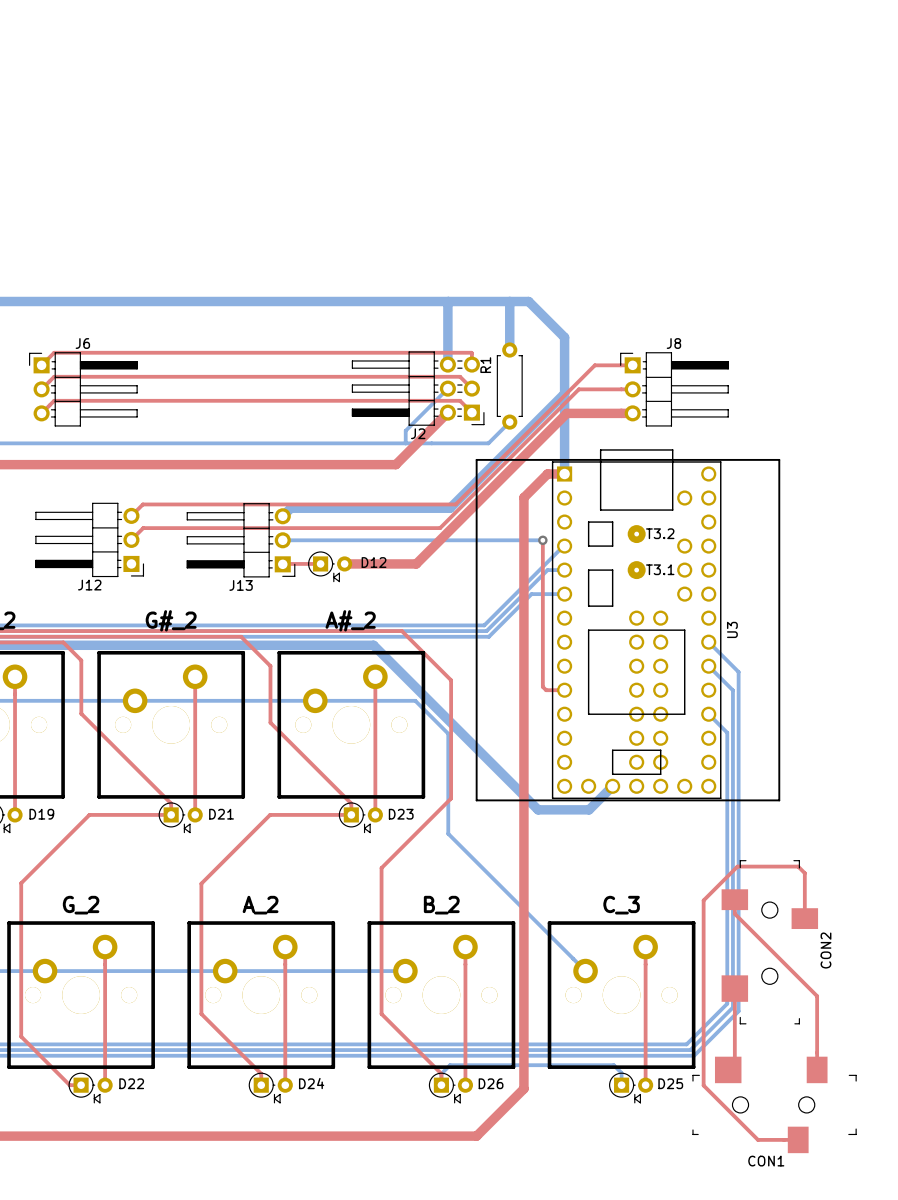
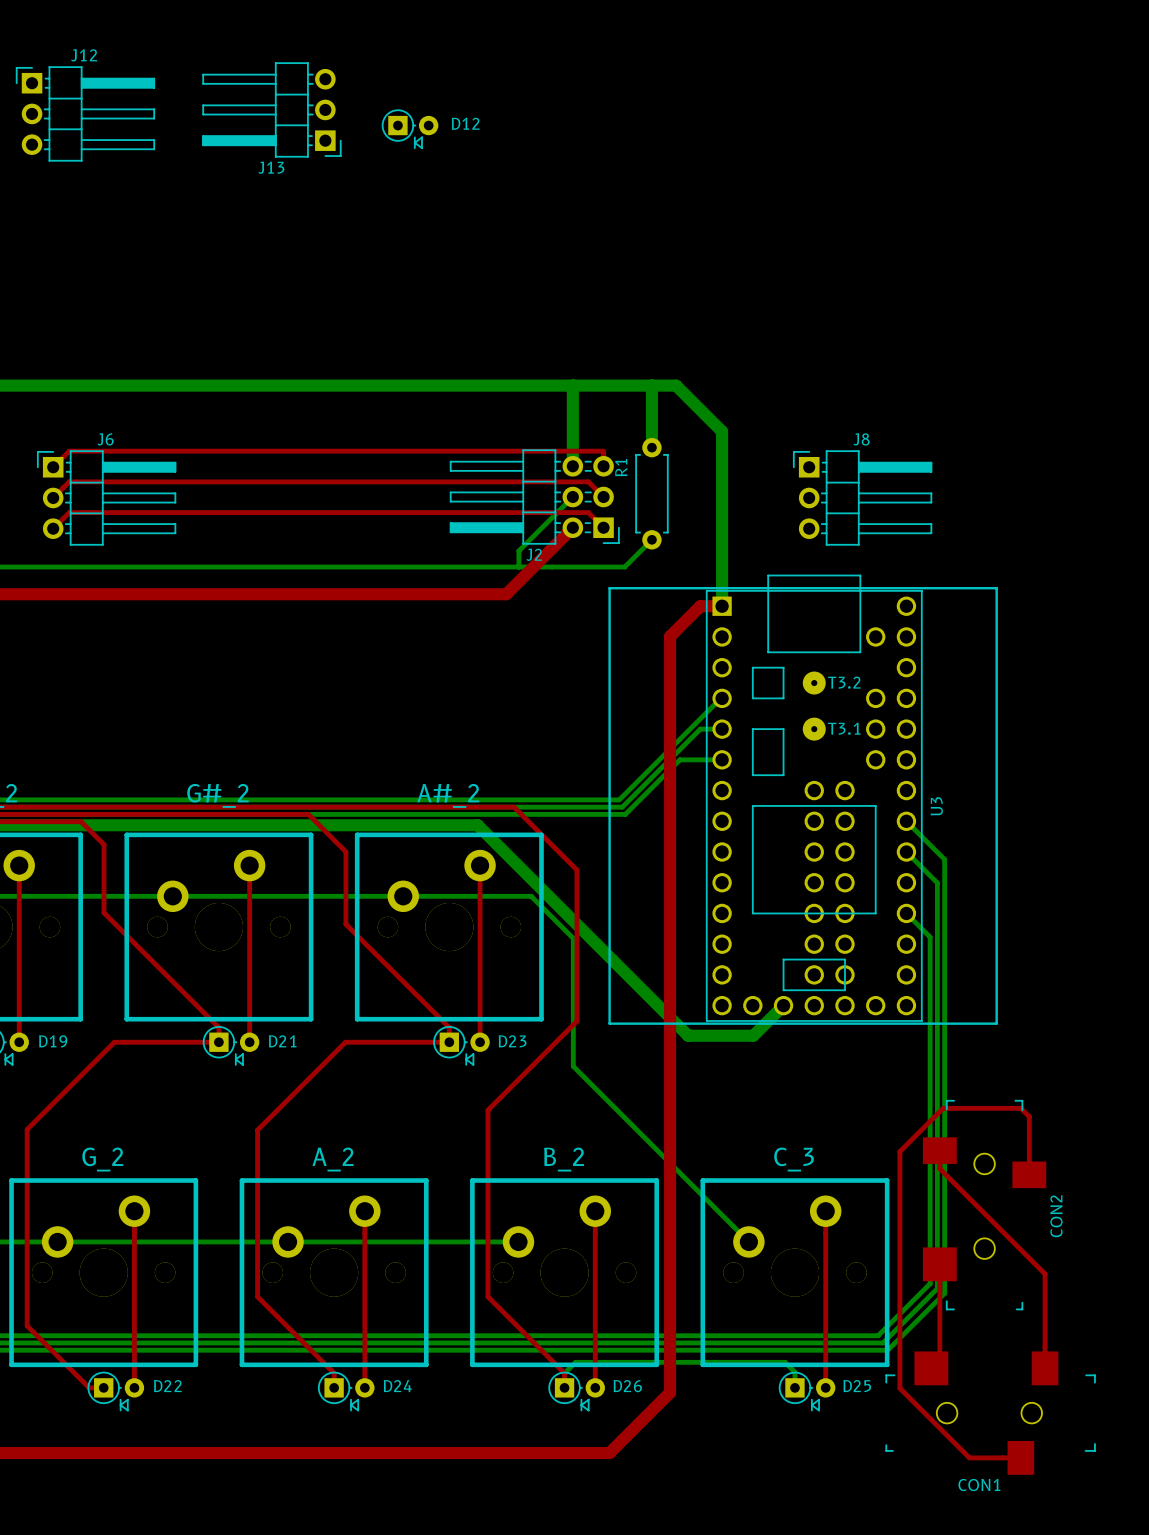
top track: (632, 365) (594, 365) (455, 504) (142, 504) (131, 515) -> none
top track: (632, 389) (578, 389) (440, 528) (143, 528) (131, 539) -> none
bottom track: (564, 393) (450, 508) (290, 508) (282, 516) -> none
top track: (632, 413) (566, 413) (416, 563) (344, 563) -> none
J12 rotation: 0° (89, 539) -> 180° (85, 113)
J12 position: (89, 539) -> (85, 113)
J13 position: (241, 540) -> (271, 109)
bottom track: (282, 540) (542, 540) -> none
top track: (542, 540) (542, 686) (546, 690) (564, 690) -> none
via: (542, 540) -> none
top track: (320, 563) (282, 564) -> none
D12 position: (330, 566) -> (410, 129)

